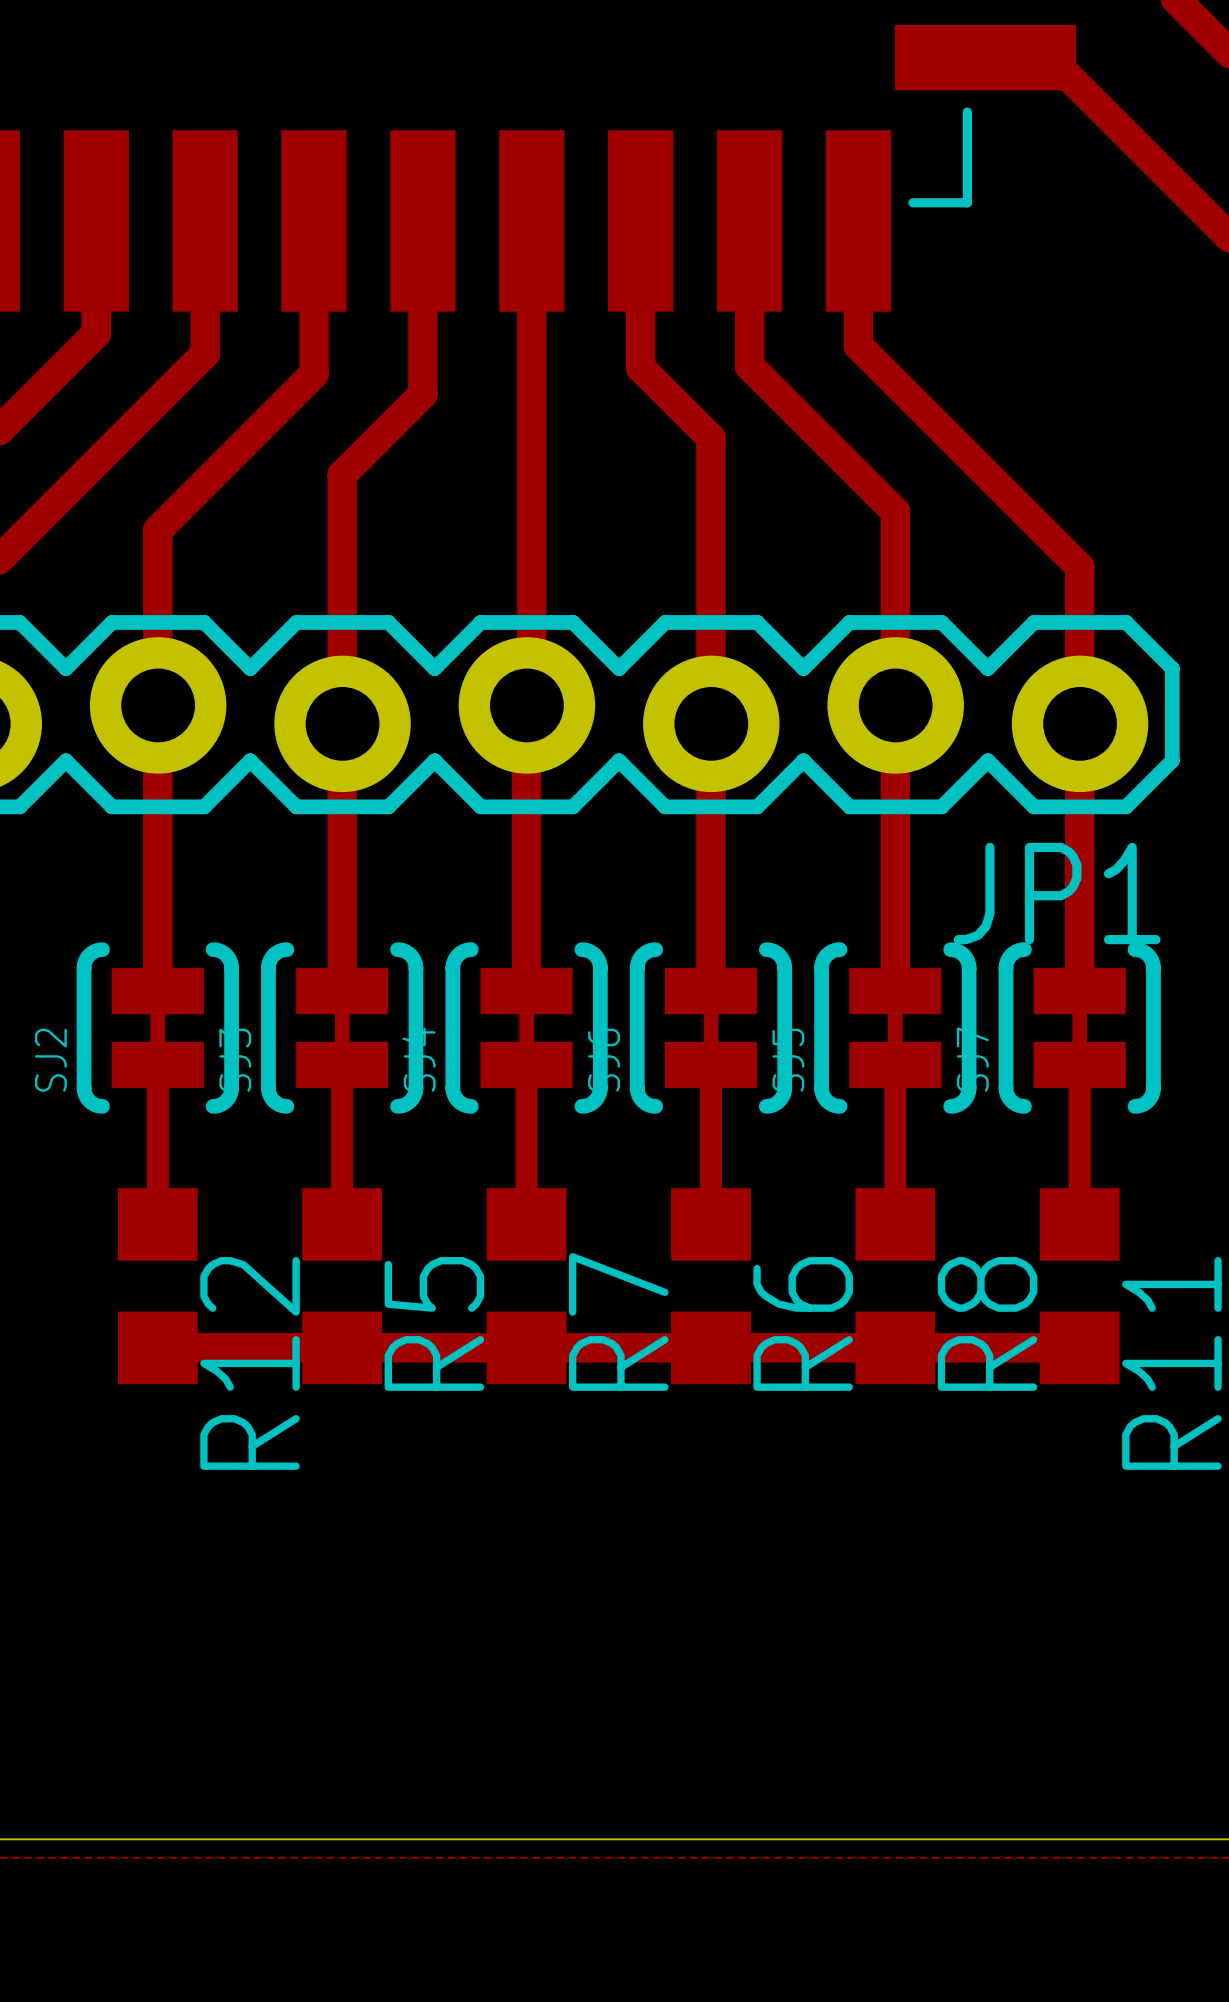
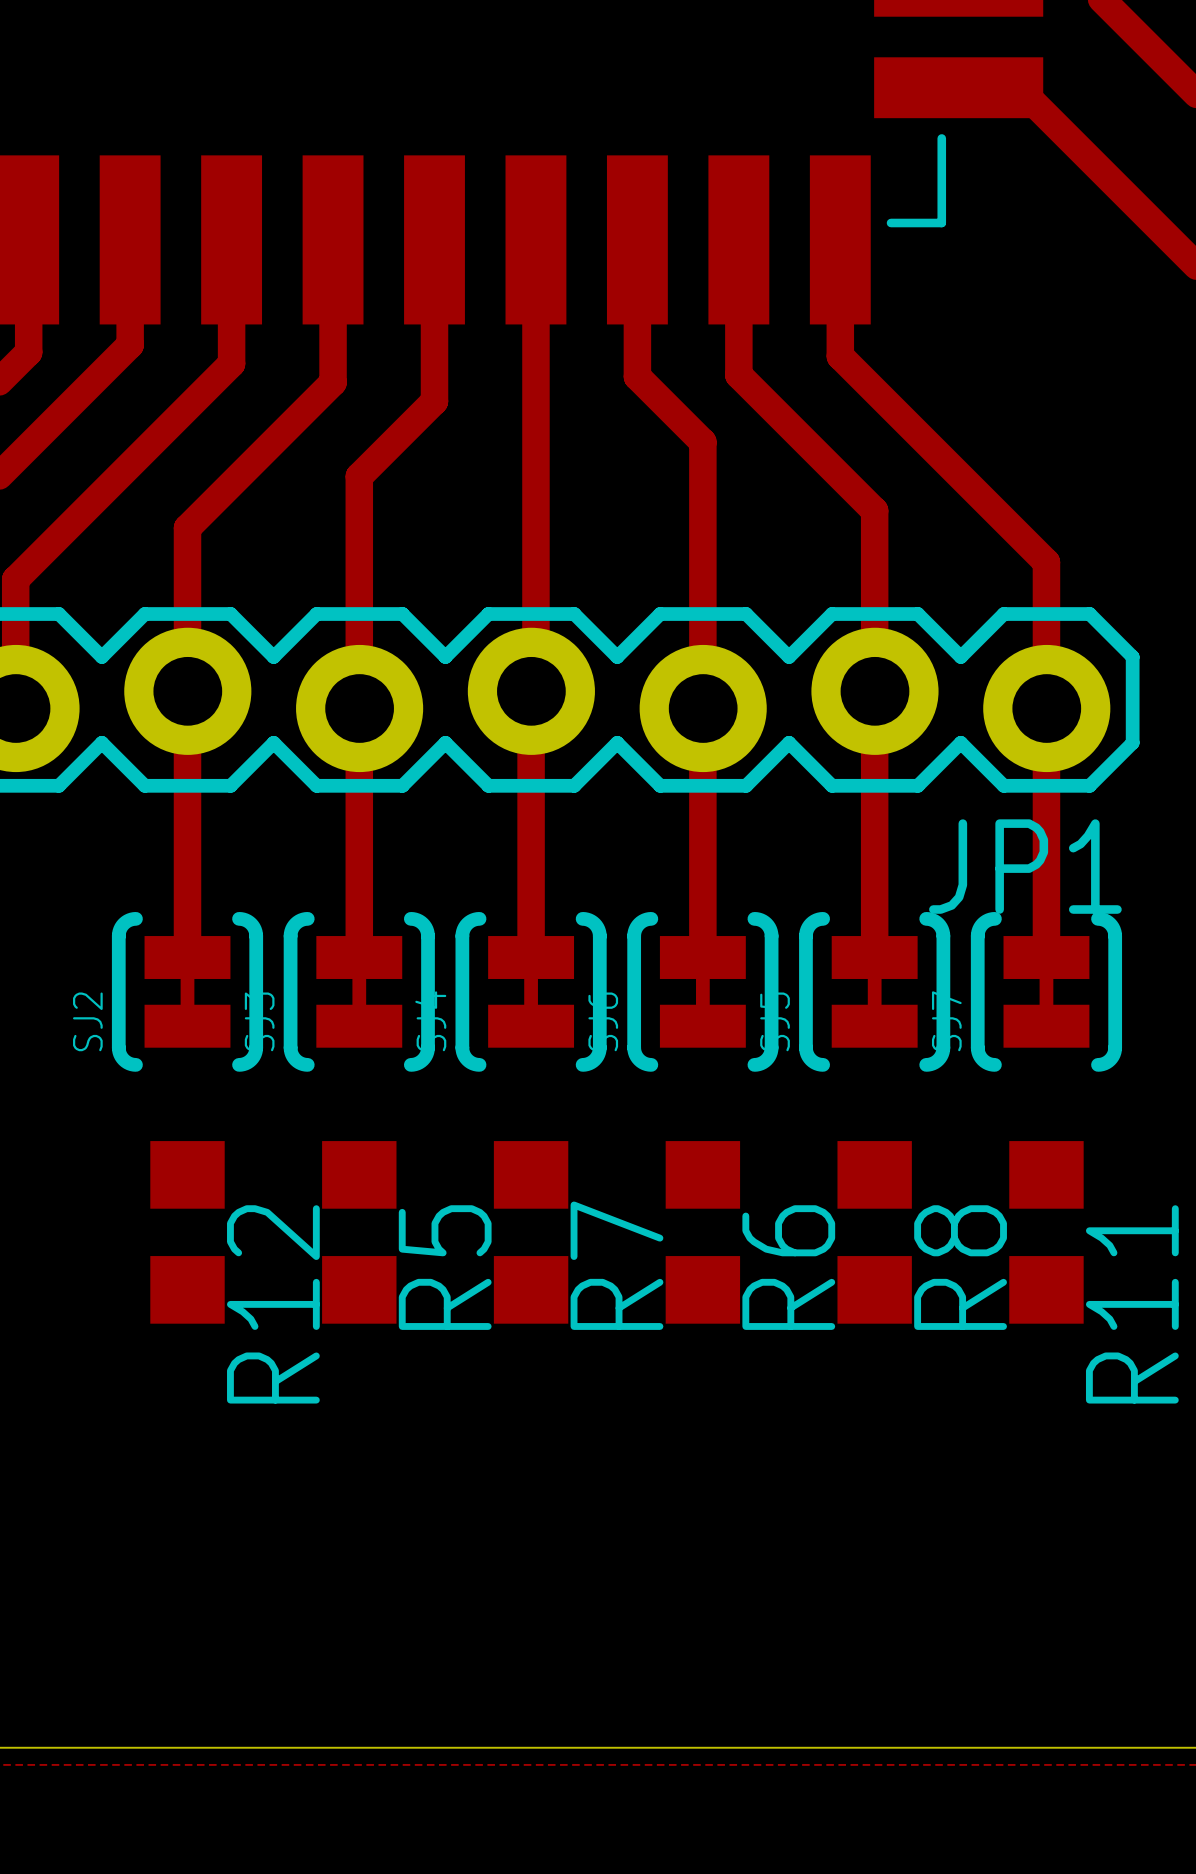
track: (157, 1064) (157, 1224) -> none
track: (342, 1064) (342, 1224) -> none
track: (526, 1064) (526, 1224) -> none
track: (710, 1064) (710, 1224) -> none
track: (895, 1064) (895, 1224) -> none
track: (1079, 1064) (1079, 1224) -> none
track: (157, 1347) (1079, 1347) -> none

